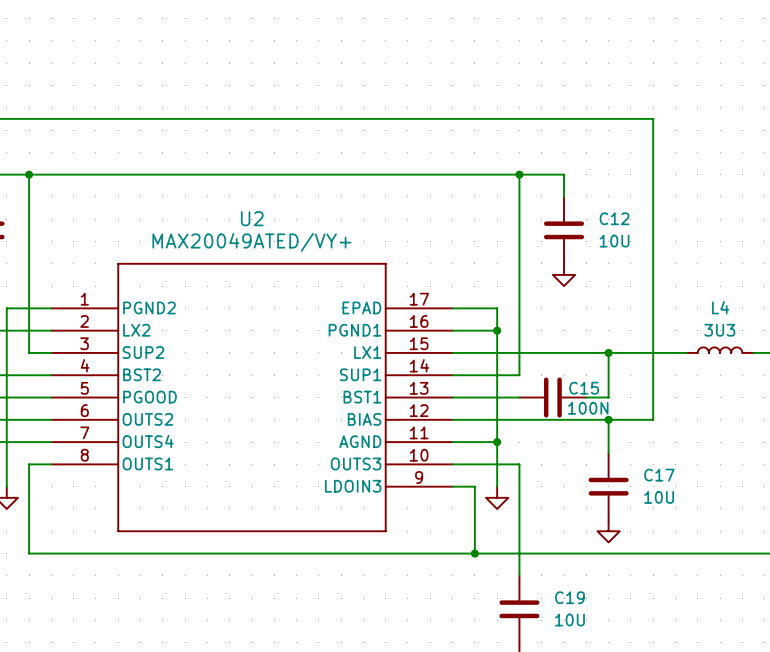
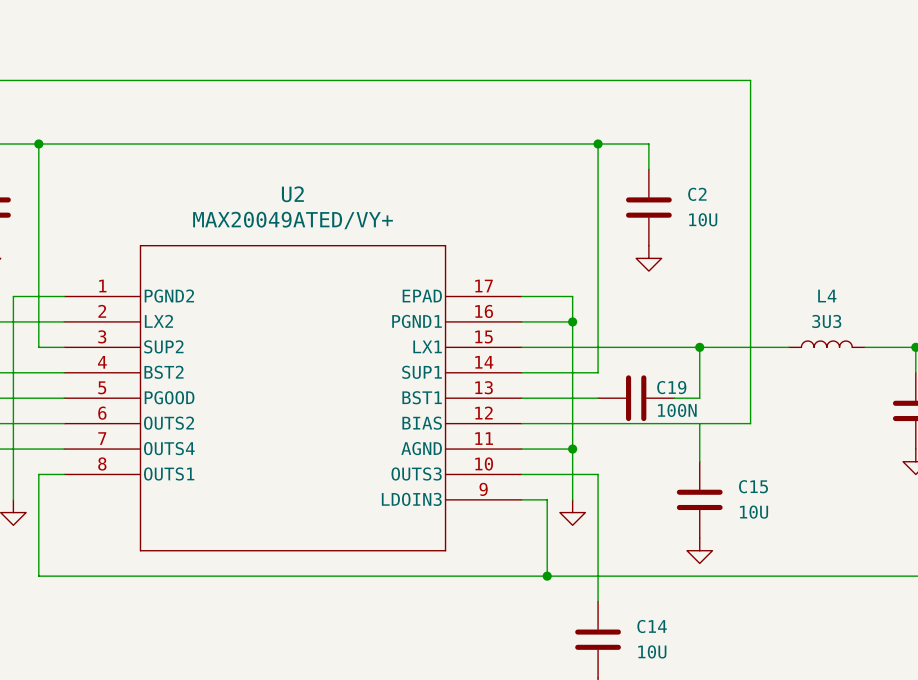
C12 name: C12 (614, 218) -> C2 (697, 194)
C15 name: C15 (584, 388) -> C19 (671, 387)
junction: (608, 419) -> none
C17 name: C17 (659, 475) -> C15 (753, 486)
C19 name: C19 (569, 597) -> C14 (652, 626)

